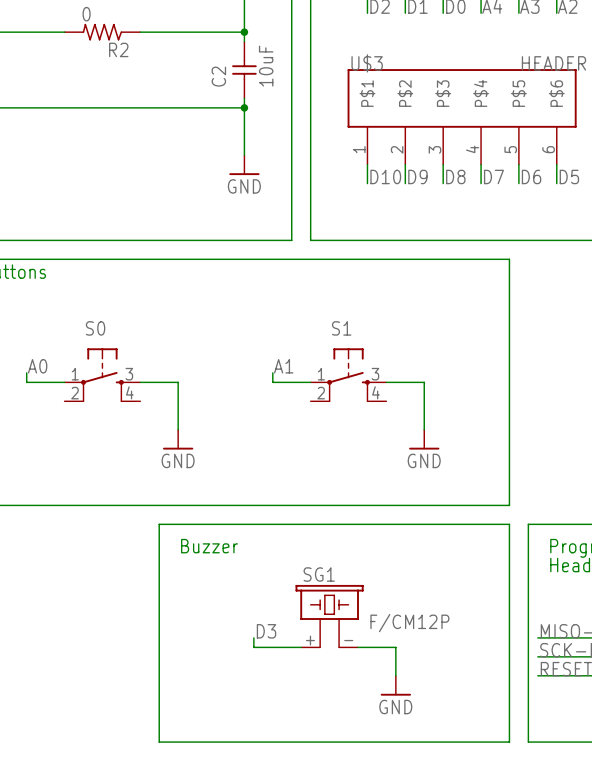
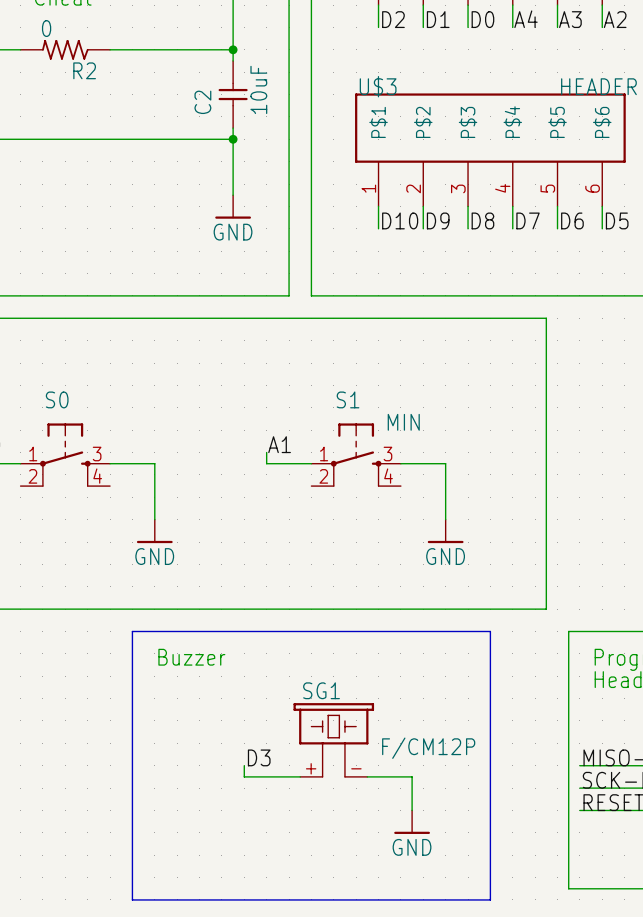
S1 value: none -> MIN (403, 422)
wire: (159, 524) (509, 524) (509, 742) (159, 742) (159, 524) -> none
line: none -> (132, 631) (132, 899) (490, 899) (490, 631) (132, 631)

